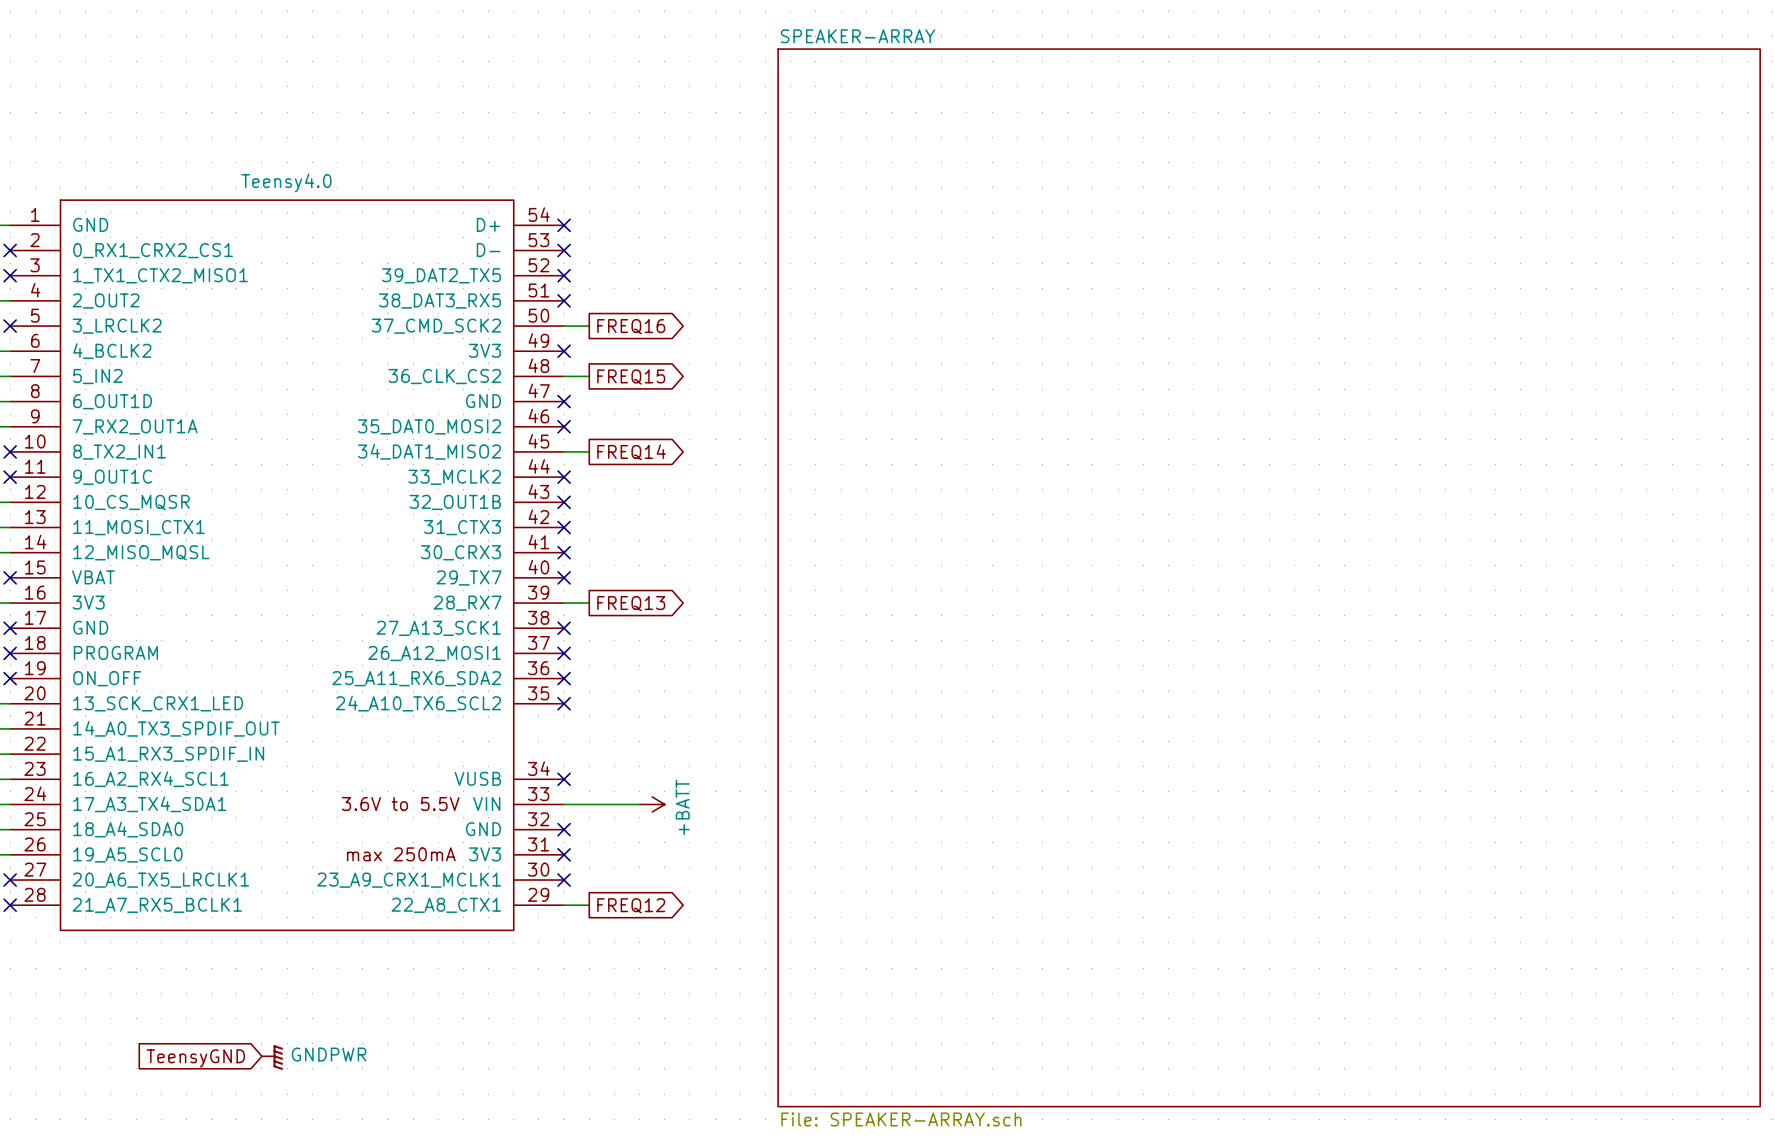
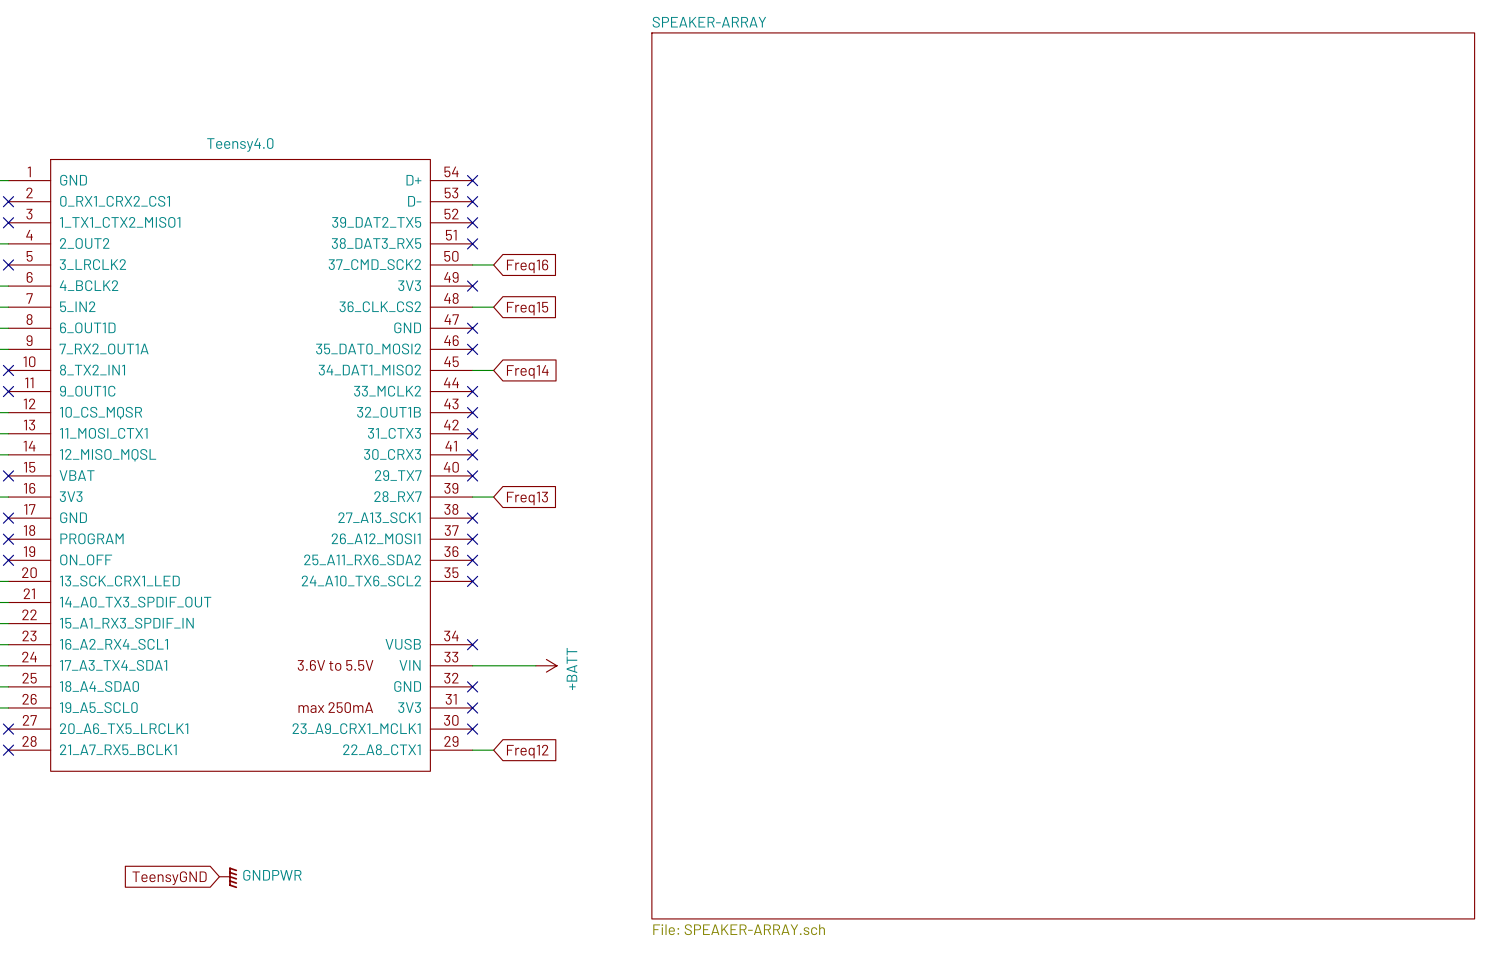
global label shape: output (631, 326) -> input (527, 266)
global label: FREQ16 (631, 326) -> Freq16 (527, 266)
global label shape: output (631, 377) -> input (527, 308)
global label: FREQ15 (631, 377) -> Freq15 (527, 308)
global label shape: output (631, 452) -> input (527, 371)
global label: FREQ14 (631, 452) -> Freq14 (527, 371)
global label shape: output (631, 603) -> input (527, 498)
global label: FREQ13 (631, 603) -> Freq13 (527, 498)
global label shape: output (631, 905) -> input (527, 751)
global label: FREQ12 (631, 905) -> Freq12 (527, 751)

